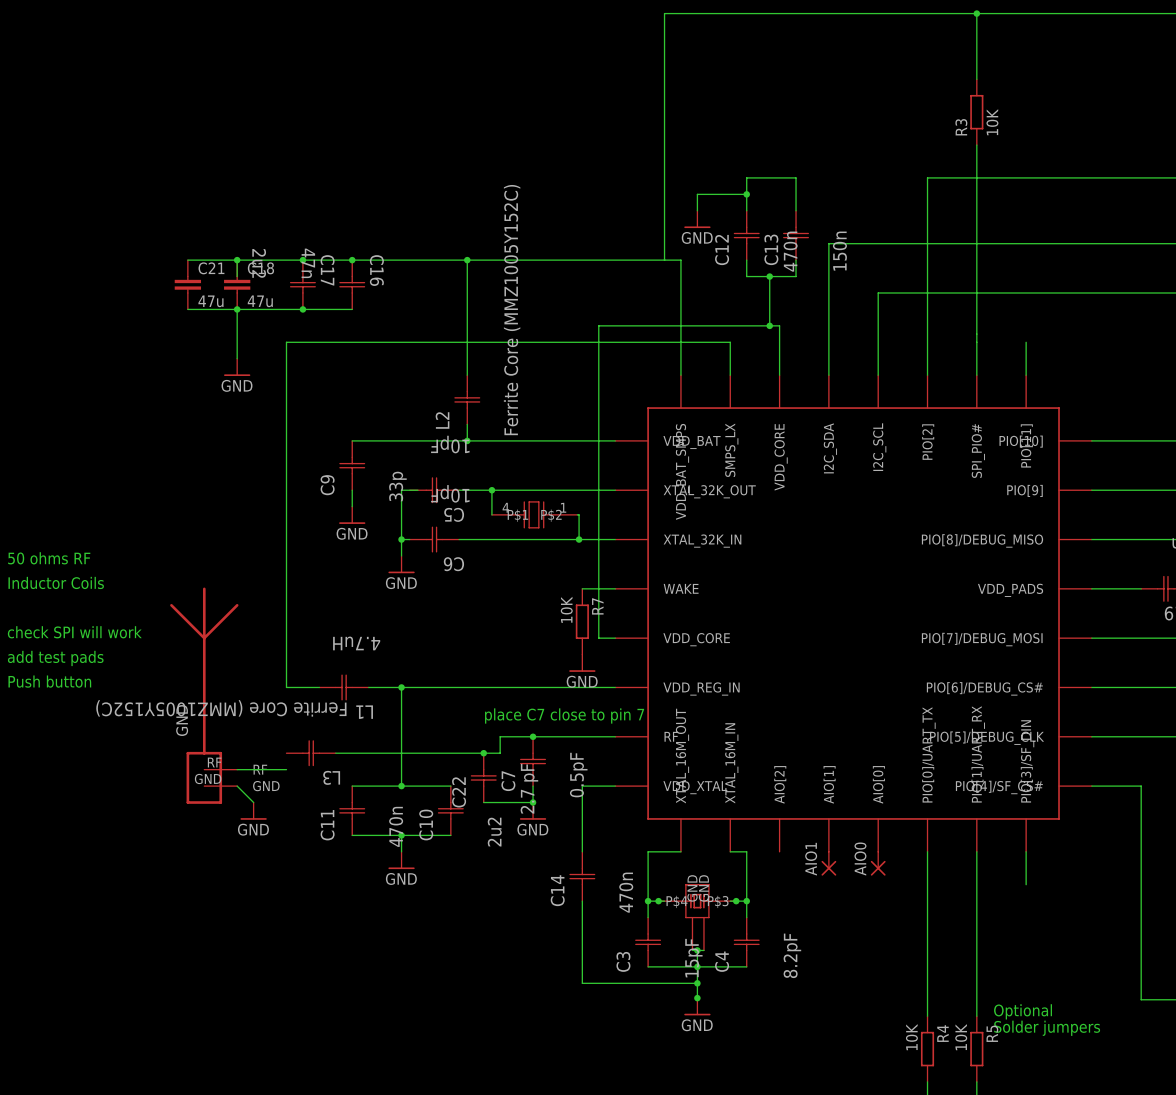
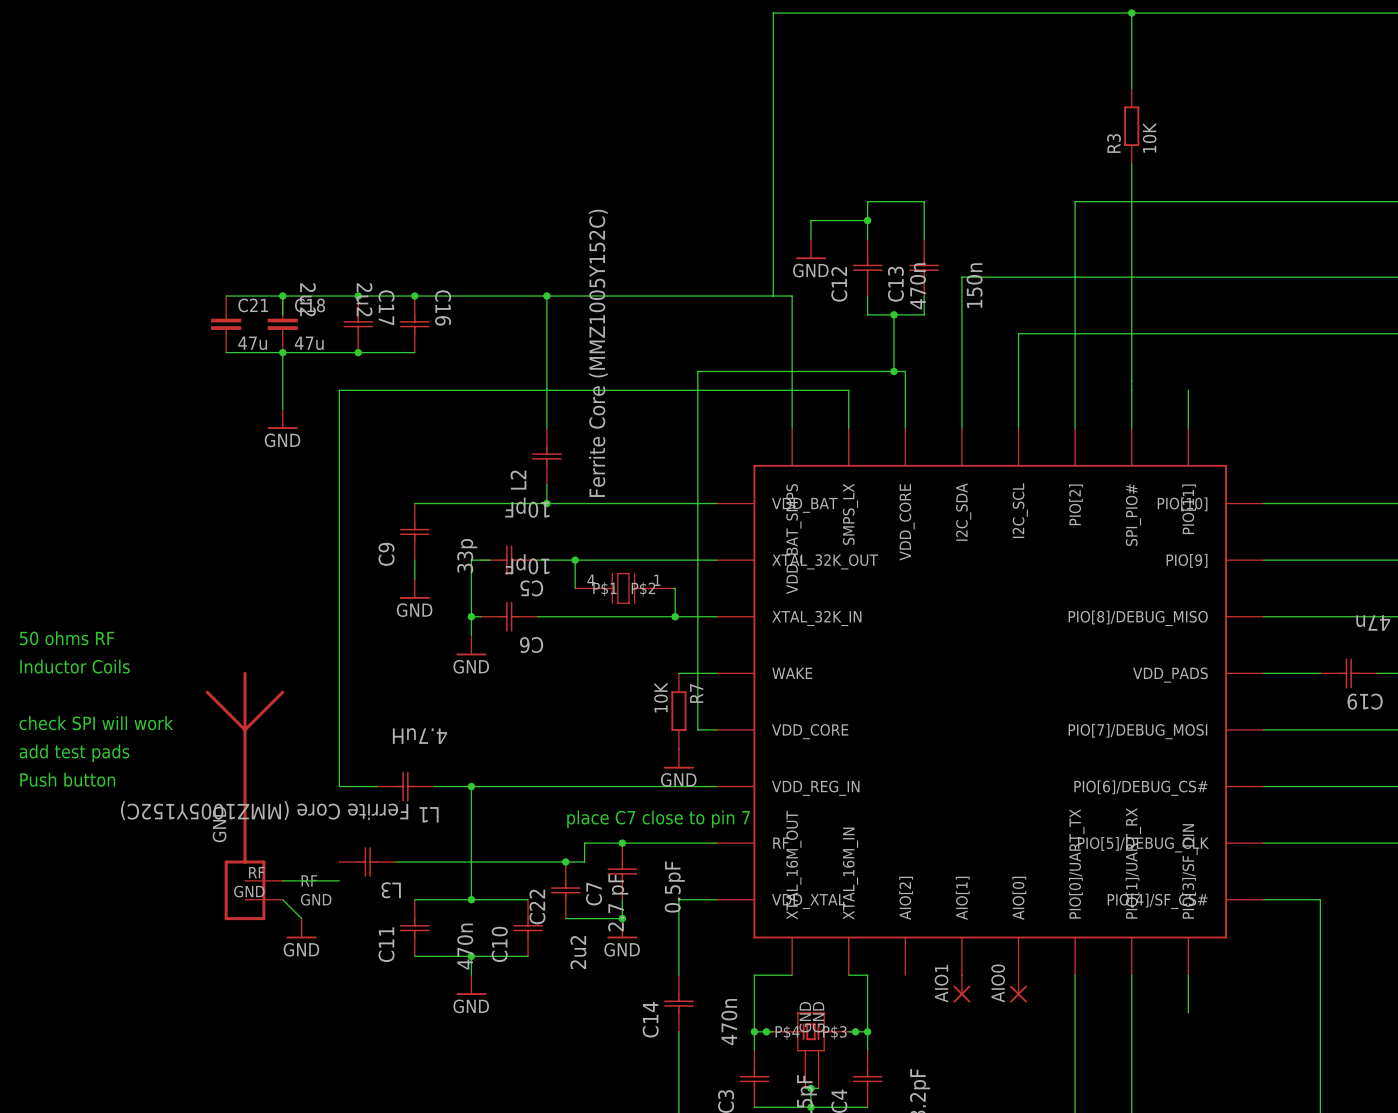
C16 value: 47n (308, 263) -> 2u2 (364, 299)

